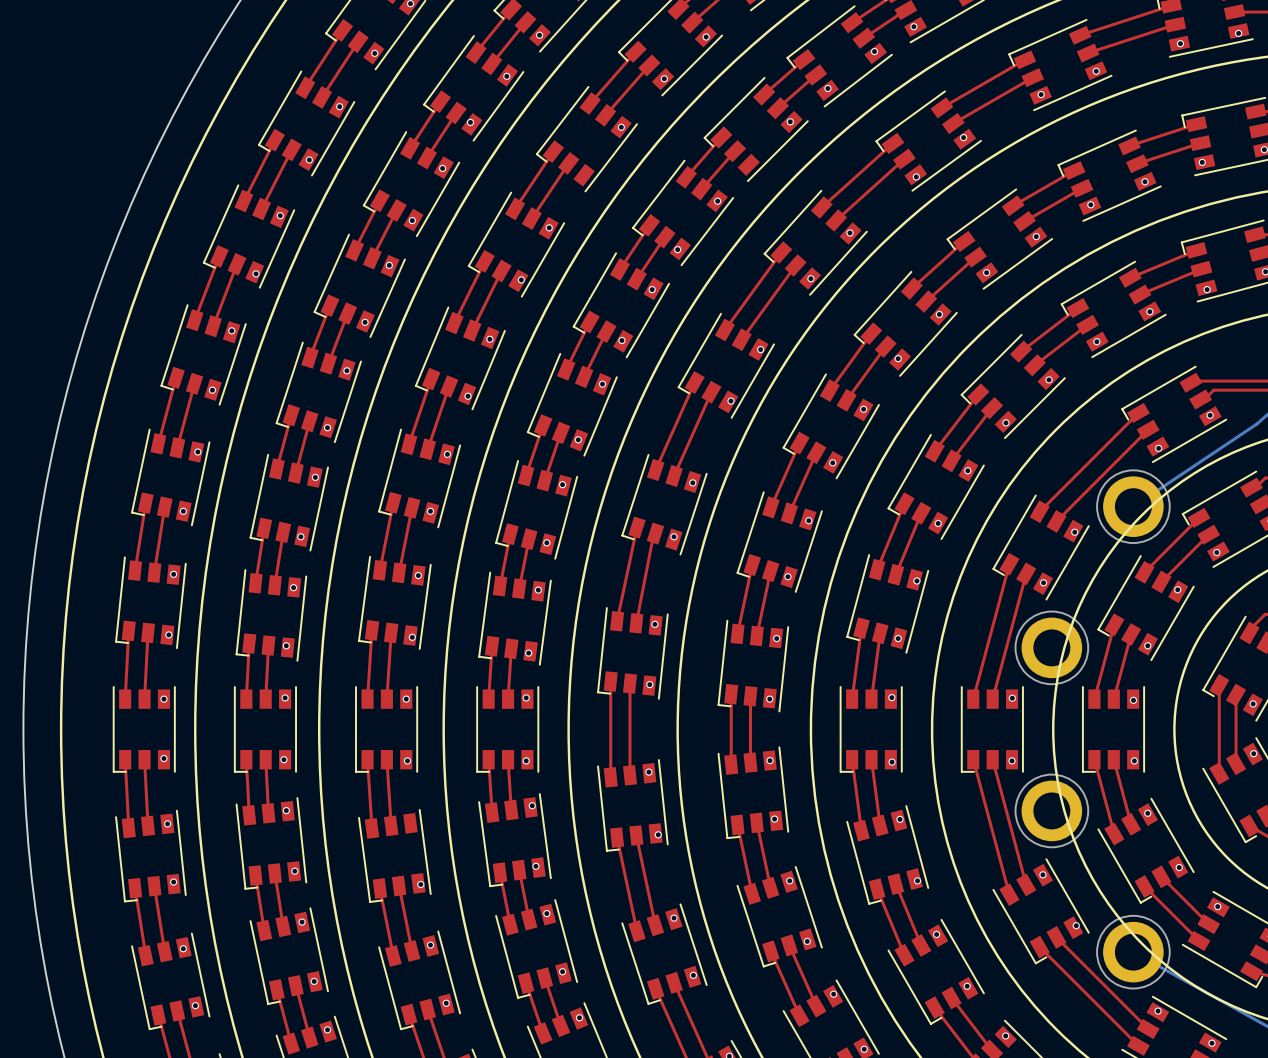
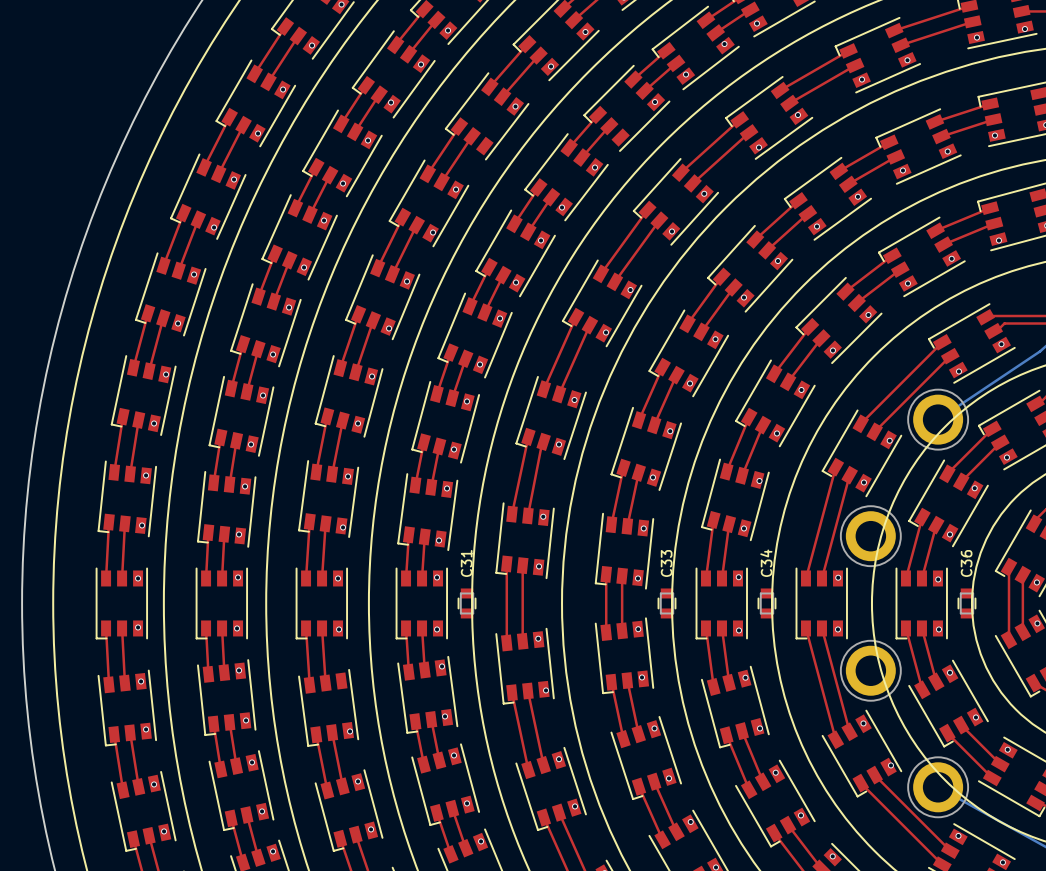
C31: none -> (467, 603)
C33: none -> (667, 603)
C34: none -> (766, 603)
C36: none -> (966, 603)

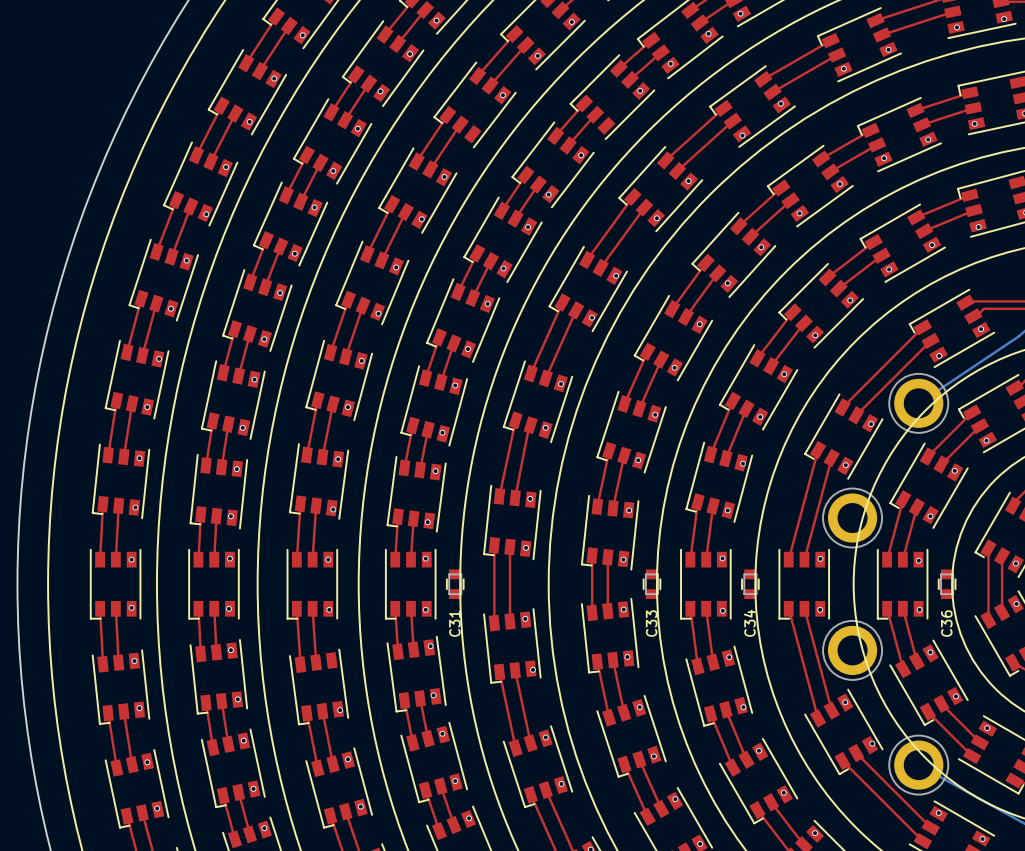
C31 name position: C31 (466, 563) -> C31 (454, 623)
C33 name position: C33 (666, 563) -> C33 (651, 623)
C34 name position: C34 (766, 563) -> C34 (749, 623)
C36 name position: C36 (966, 563) -> C36 (946, 623)

